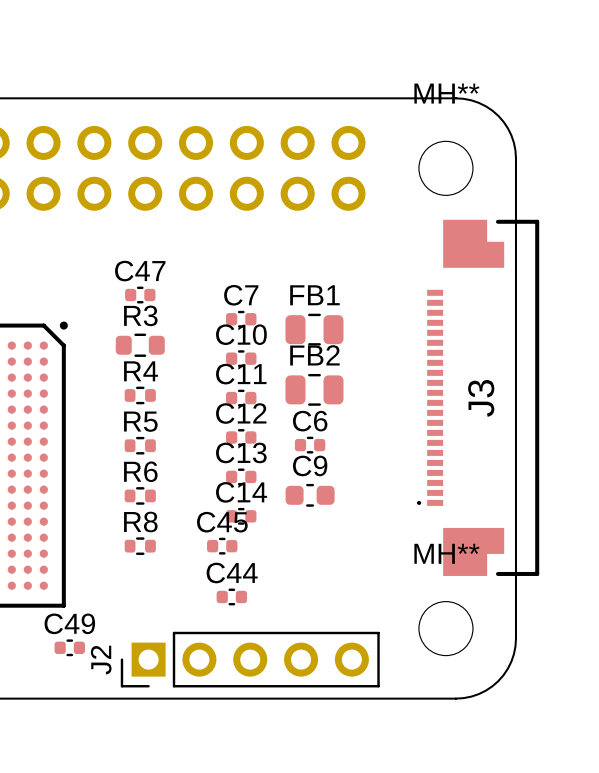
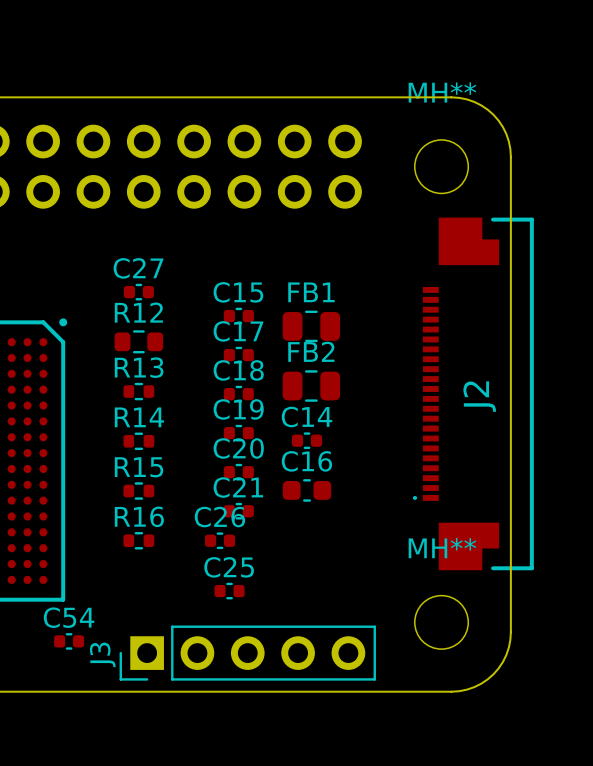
C47 name: C47 (140, 271) -> C27 (138, 268)
C7 name: C7 (241, 295) -> C15 (238, 292)
R3 name: R3 (140, 315) -> R12 (138, 312)
C10 name: C10 (241, 334) -> C17 (238, 331)
R4 name: R4 (141, 371) -> R13 (139, 367)
C11 name: C11 (241, 374) -> C18 (238, 370)
J3 name: J3 (481, 398) -> J2 (479, 396)
C12 name: C12 (241, 413) -> C19 (238, 409)
R5 name: R5 (140, 421) -> R14 (139, 417)
C6 name: C6 (310, 421) -> C14 (307, 416)
C13 name: C13 (241, 452) -> C20 (238, 448)
C9 name: C9 (310, 465) -> C16 (306, 461)
R6 name: R6 (140, 471) -> R15 (139, 467)
C14 name: C14 (241, 492) -> C21 (238, 487)
R8 name: R8 (140, 521) -> R16 (139, 516)
C45 name: C45 (222, 522) -> C26 (219, 517)
C44 name: C44 (232, 573) -> C25 (229, 567)
C49 name: C49 (69, 623) -> C54 (69, 617)
J2 name: J2 (101, 660) -> J3 (102, 654)

